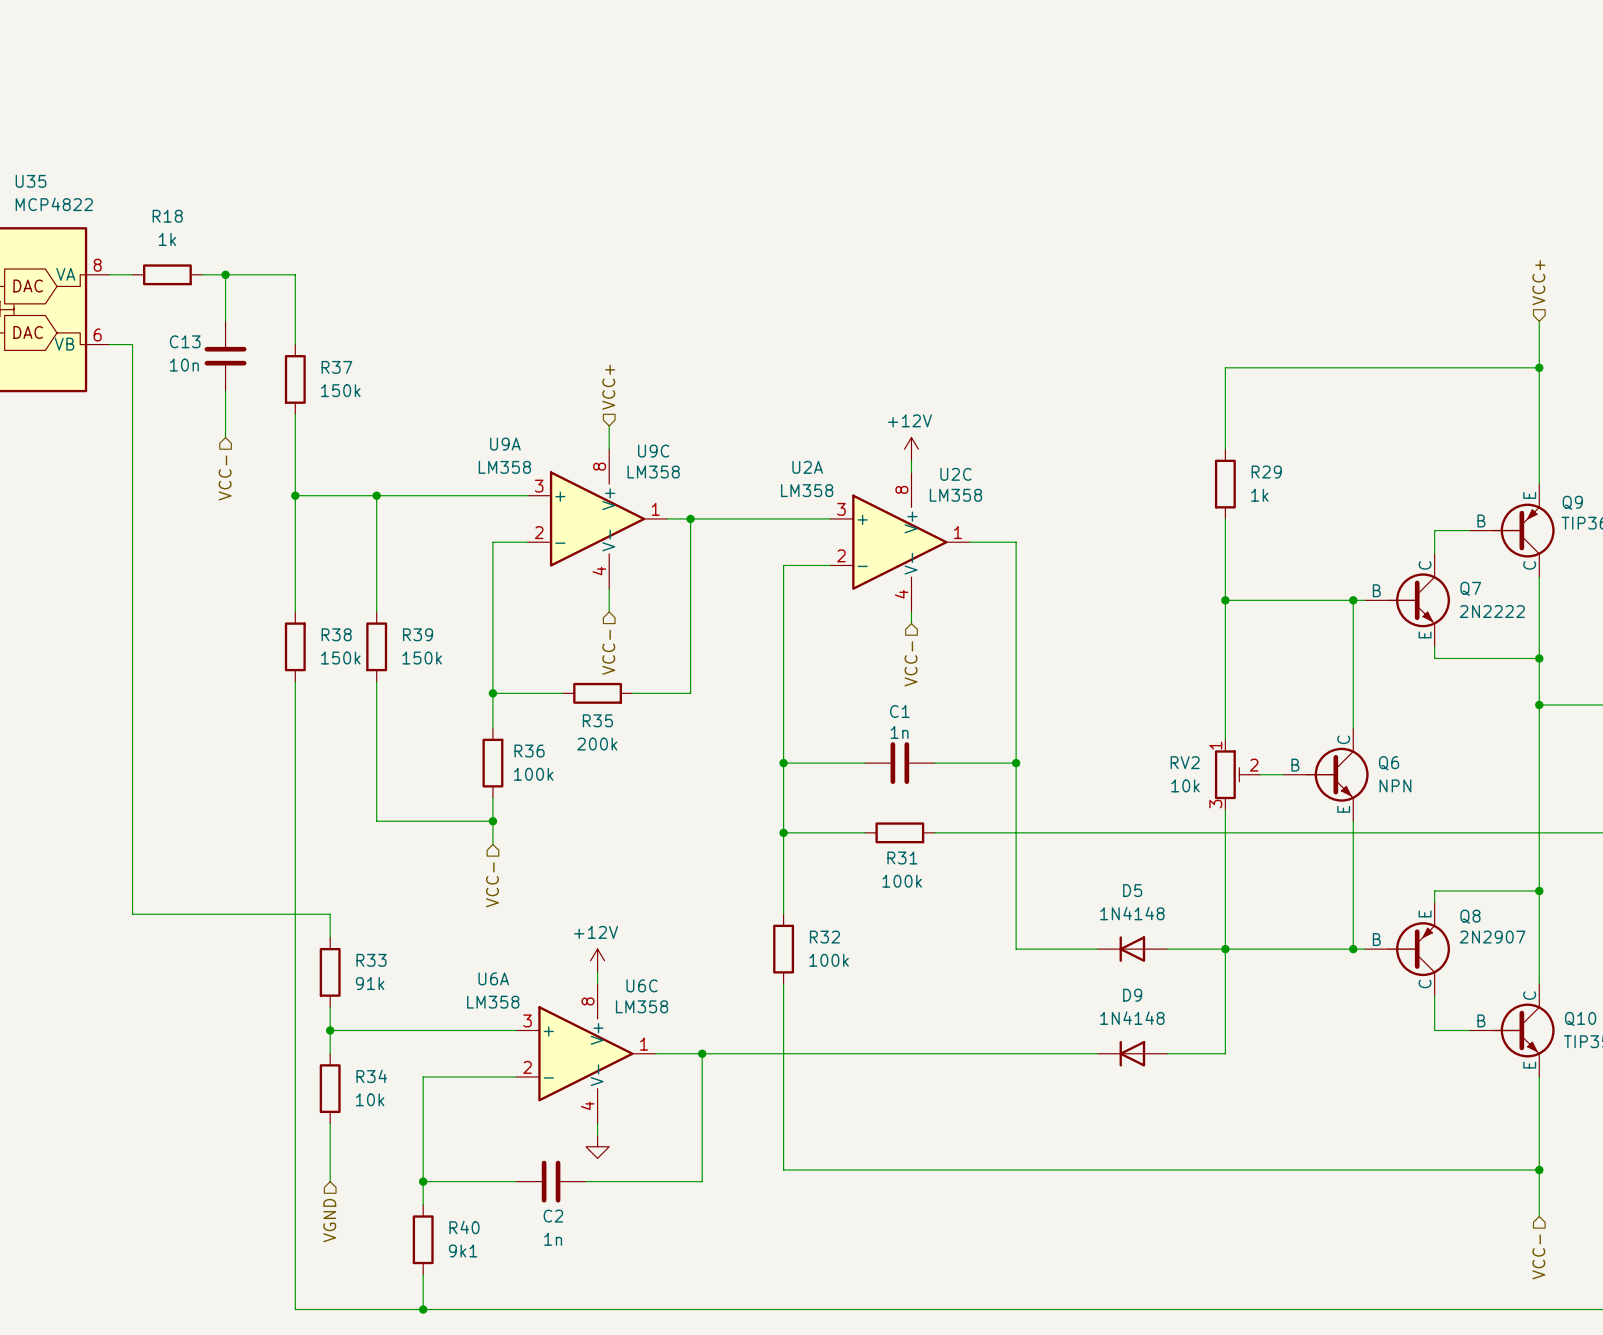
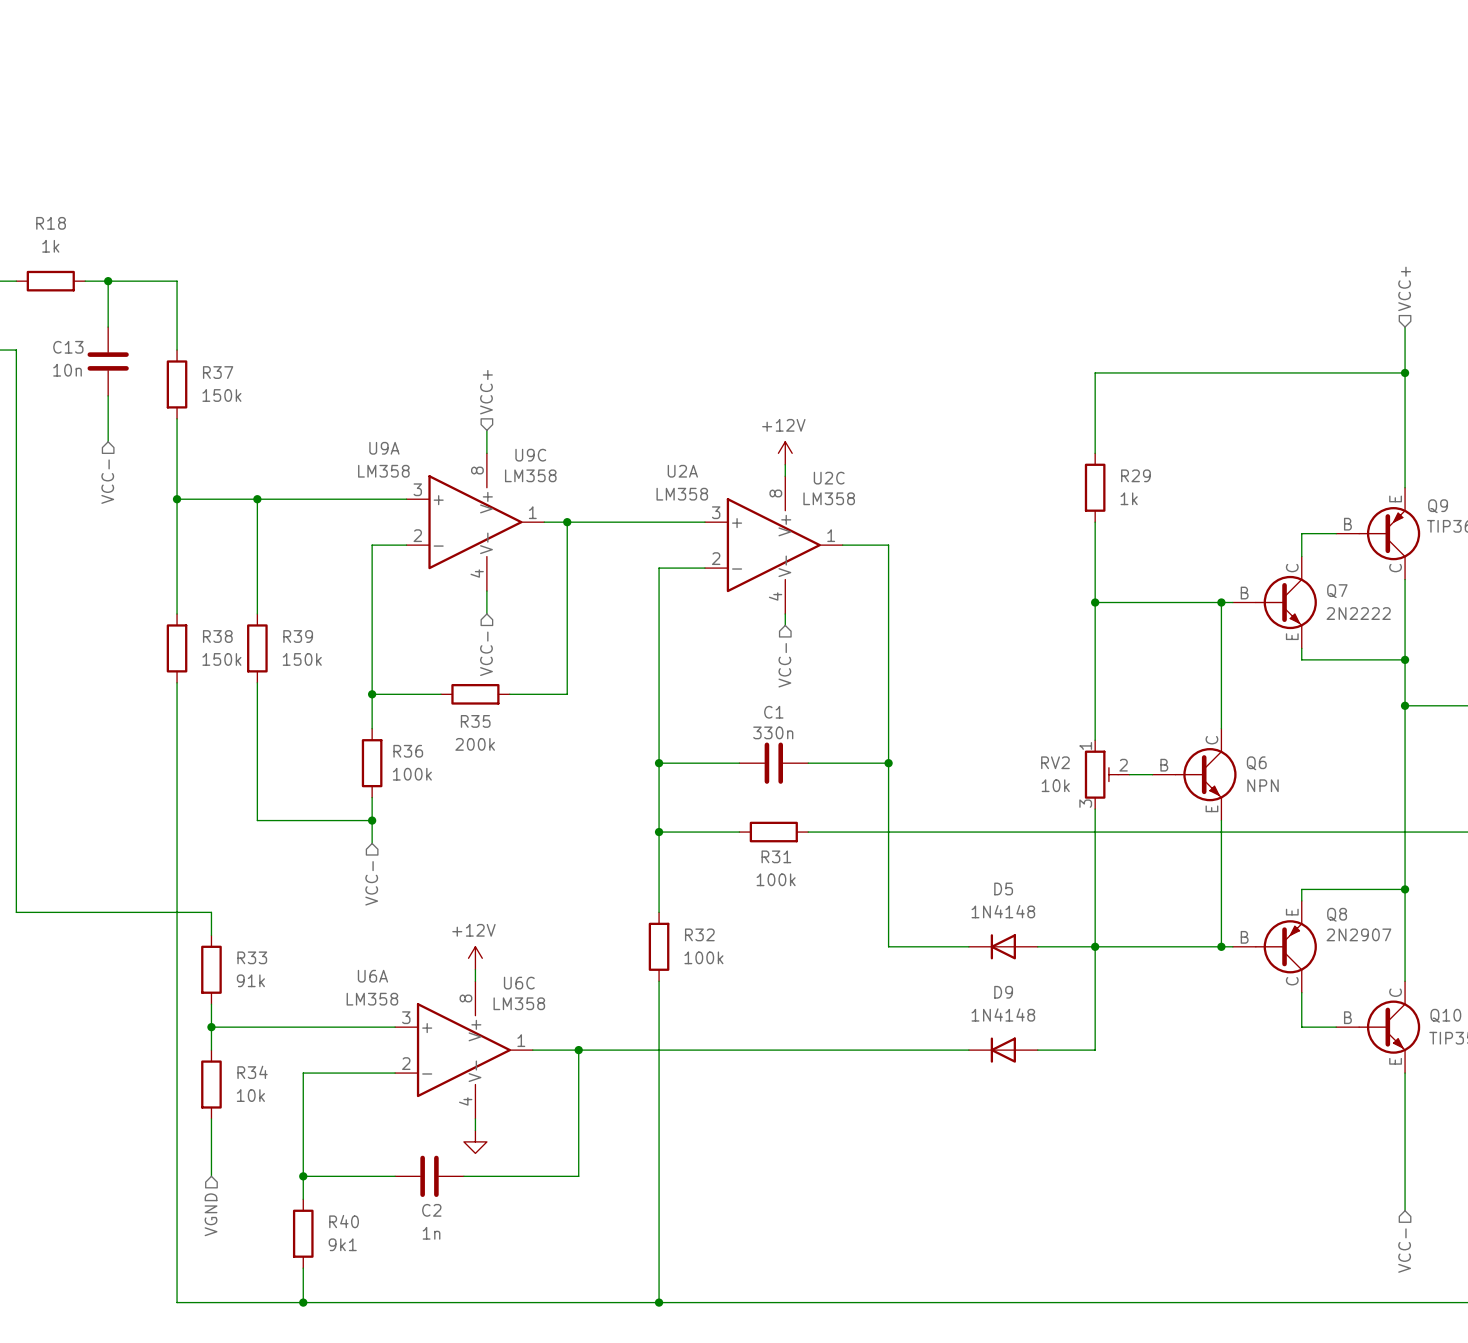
C1 value: 1n (899, 732) -> 330n (773, 732)
wire: (783, 1170) (1539, 1170) -> (659, 1164) (659, 1302)
junction: (1539, 1170) -> none
junction: none -> (659, 1302)

